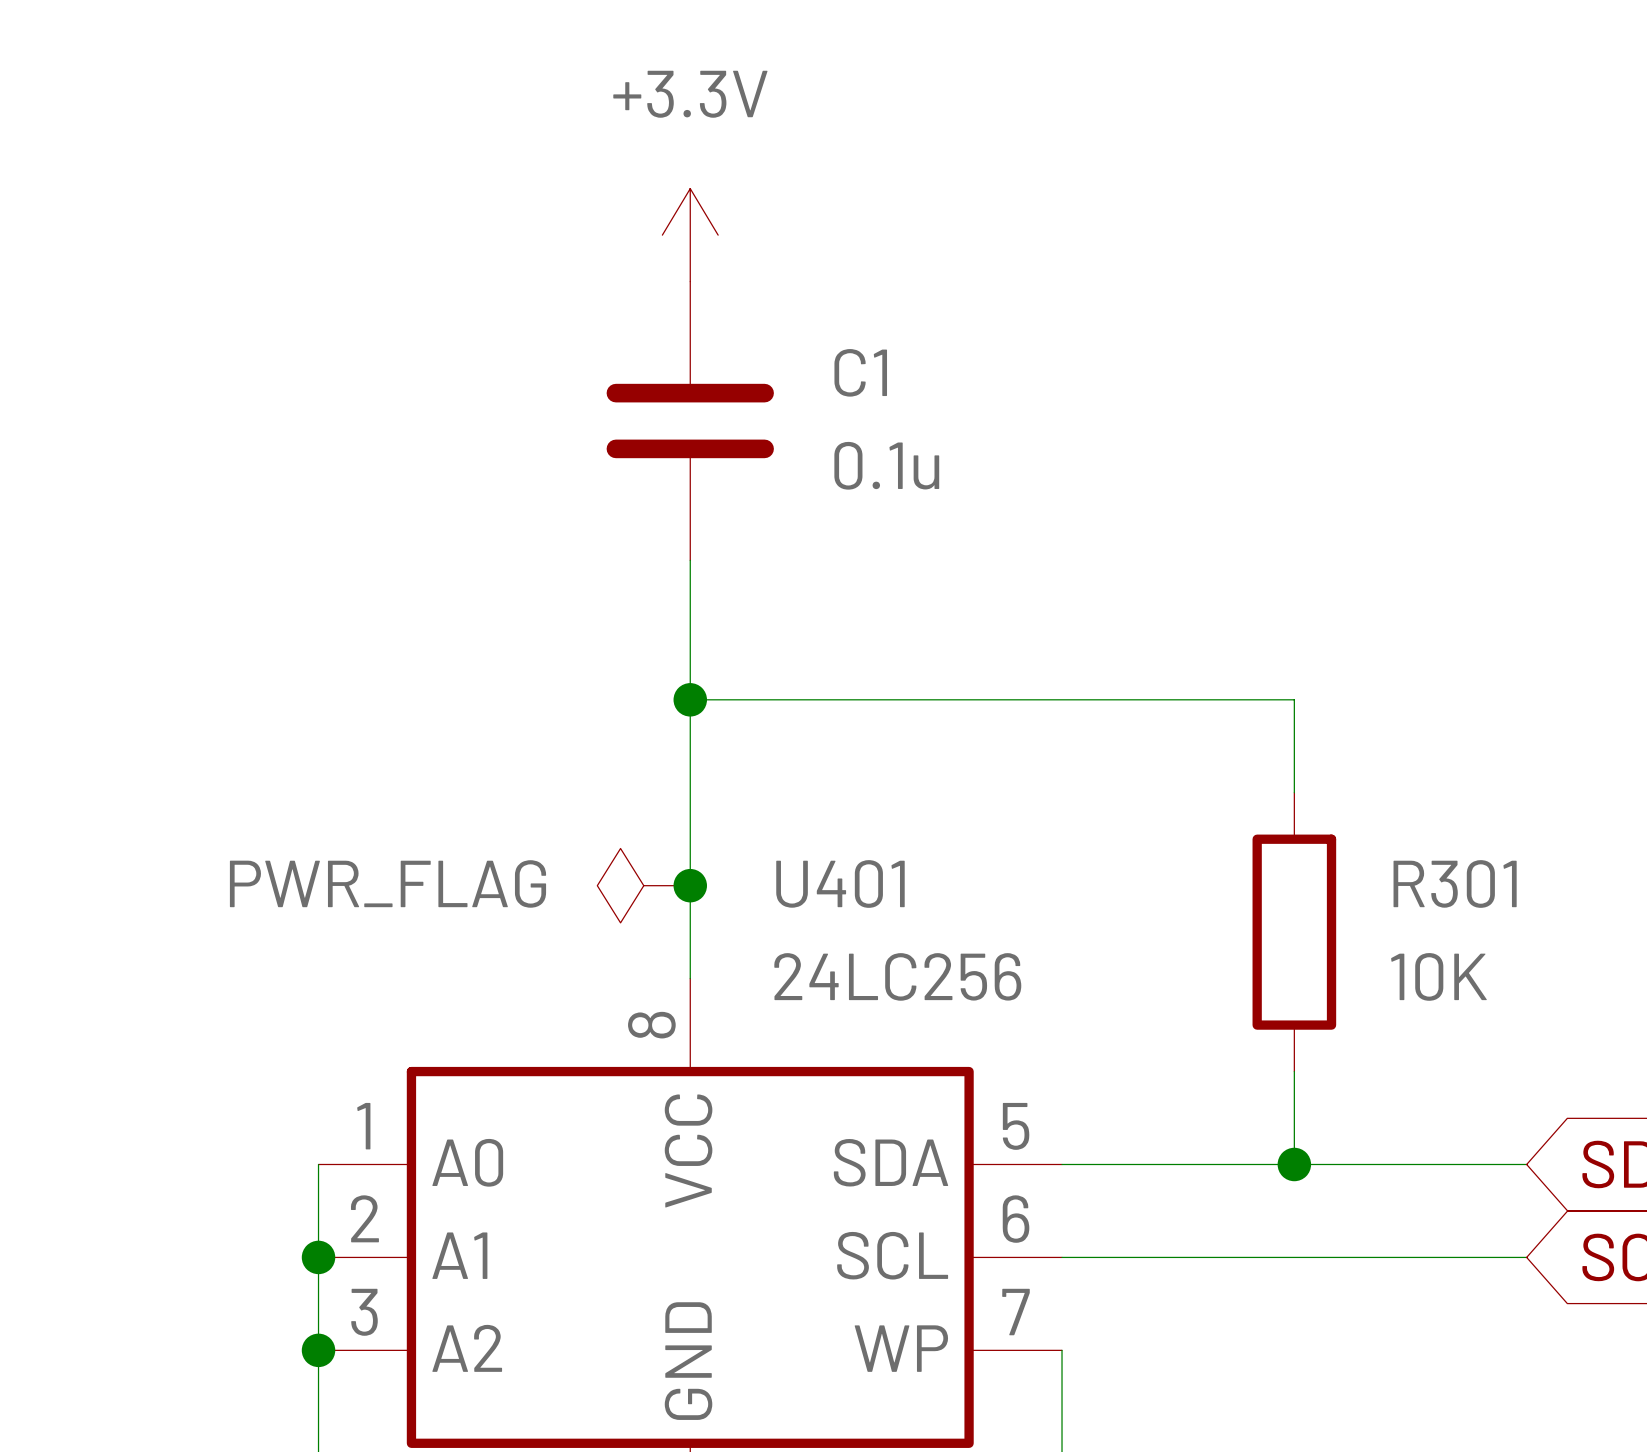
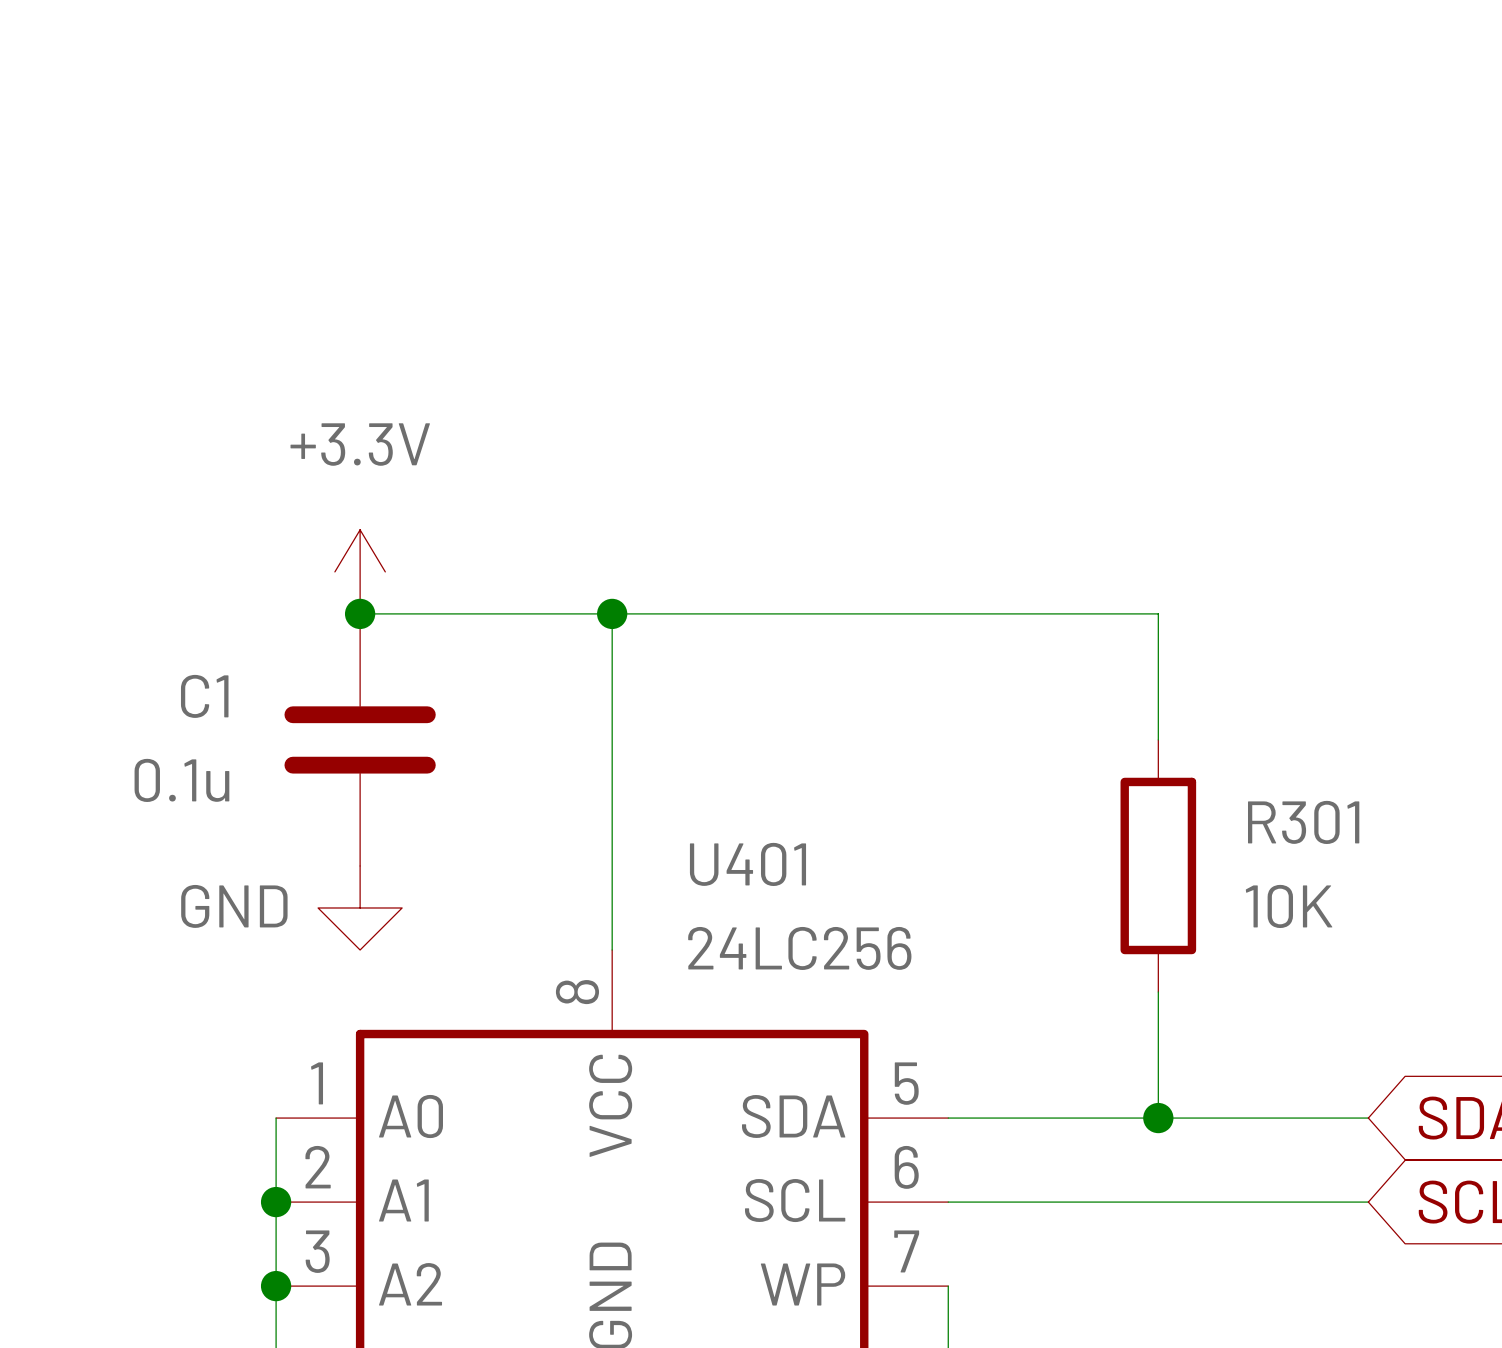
power symbol position: +3.3V (690, 235) -> +3.3V (360, 571)
C1 name position: C1 (860, 372) -> C1 (204, 696)
C1 position: (690, 421) -> (360, 739)
C1 value position: 0.1u (886, 465) -> 0.1u (181, 780)
wire: (690, 560) (690, 606) -> none
junction: none -> (360, 613)
wire: (690, 699) (1294, 699) -> (360, 613) (1158, 613) (1158, 697)
junction position: (690, 699) -> (612, 613)
power symbol: PWR_FLAG (643, 885) -> none
junction: (690, 885) -> none
power symbol: none -> GND (360, 907)
R301 position: (1294, 932) -> (1158, 865)

